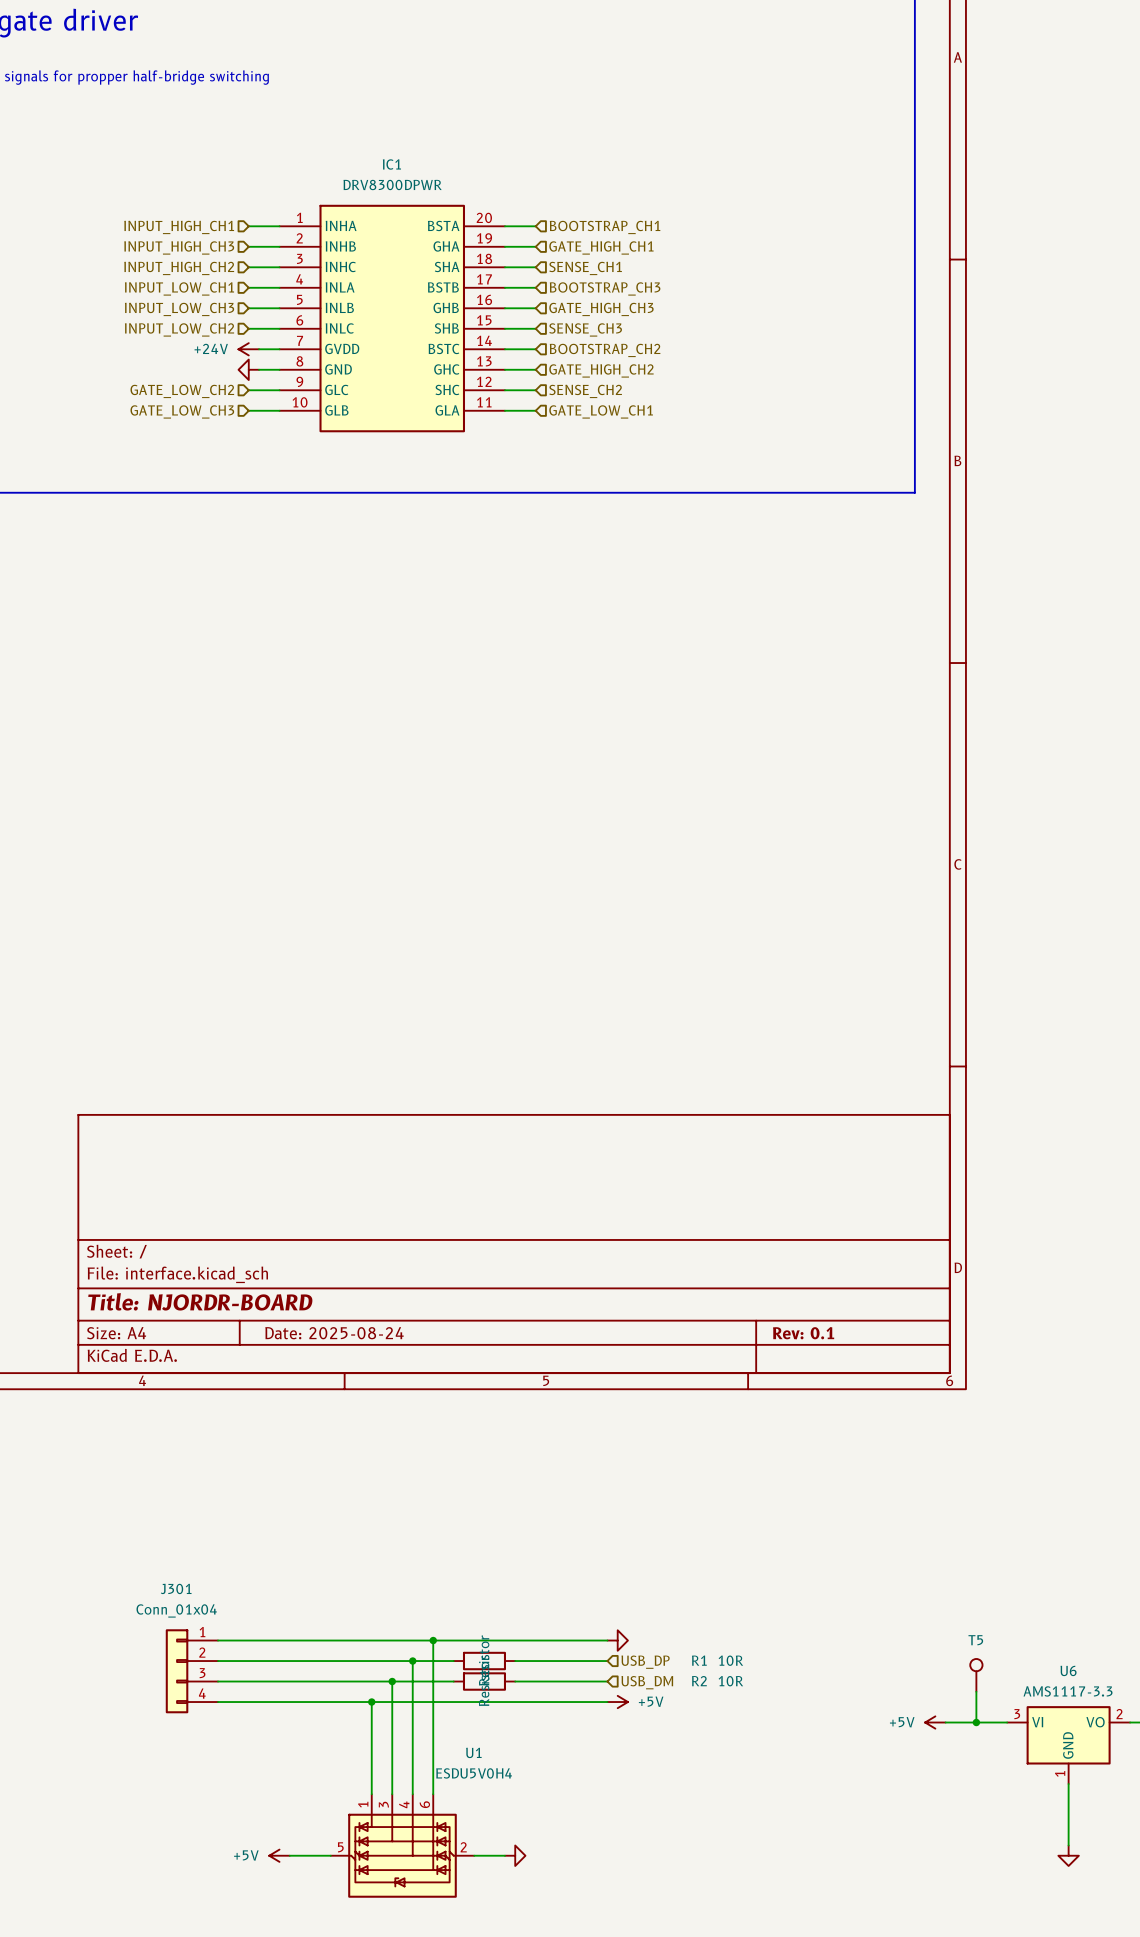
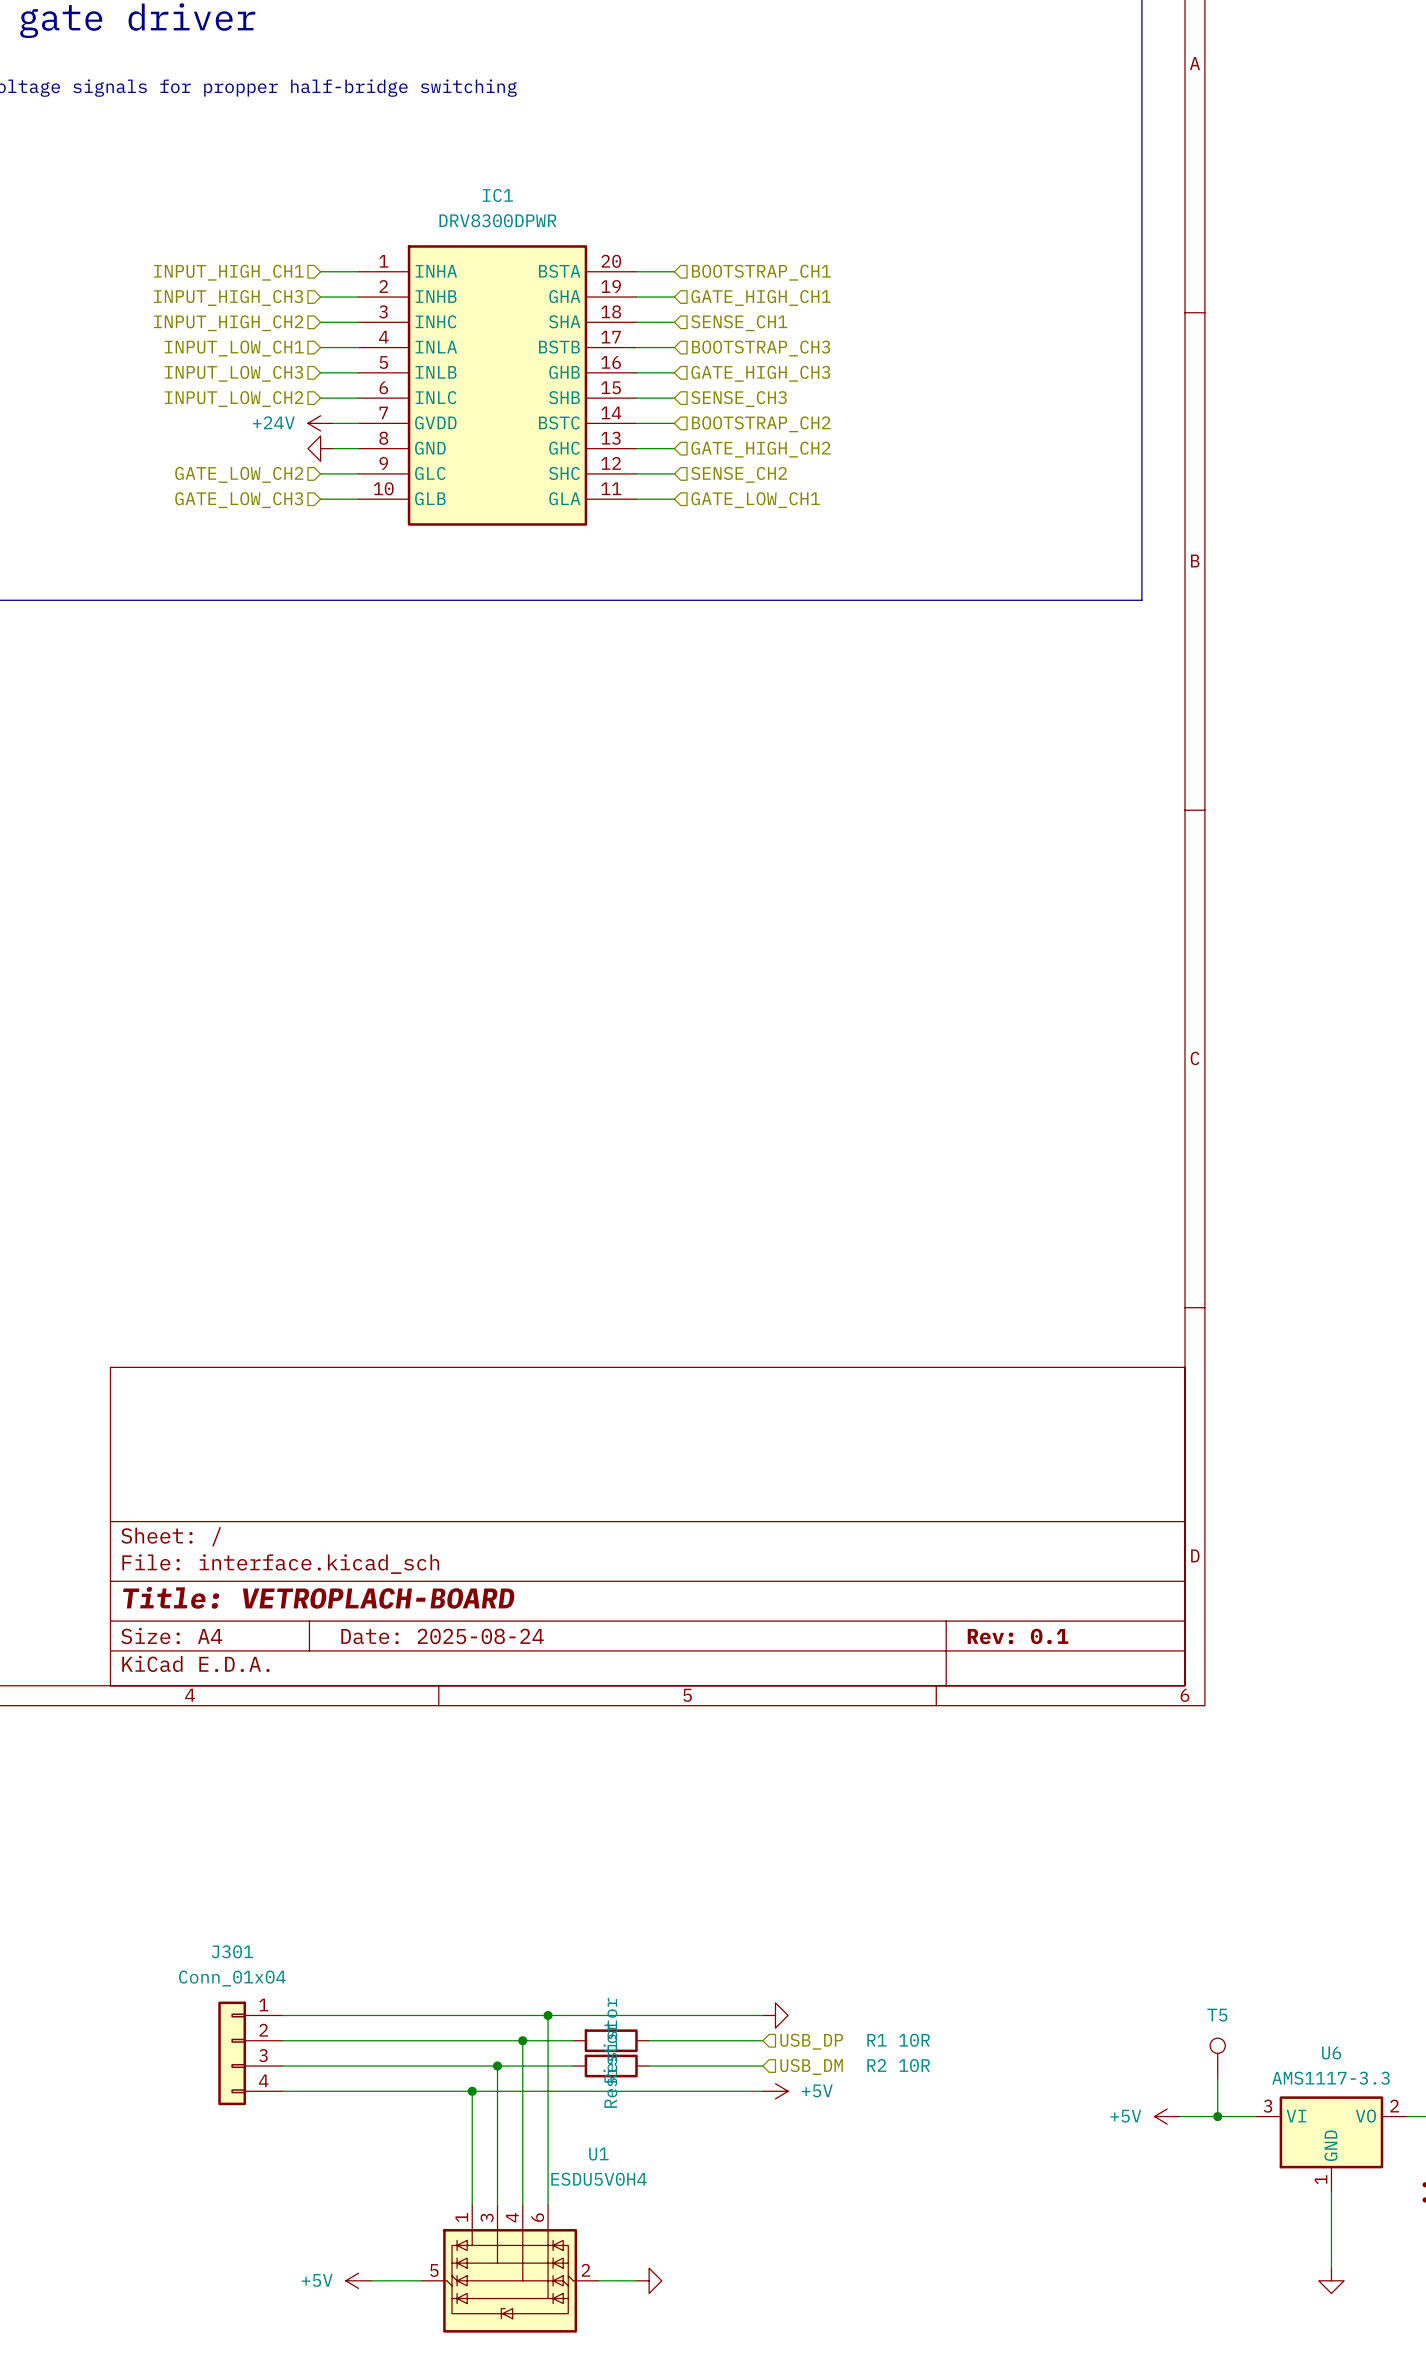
title block: Title: NJORDR-BOARD (200, 1301) -> Title: VETROPLACH-BOARD (318, 1597)

